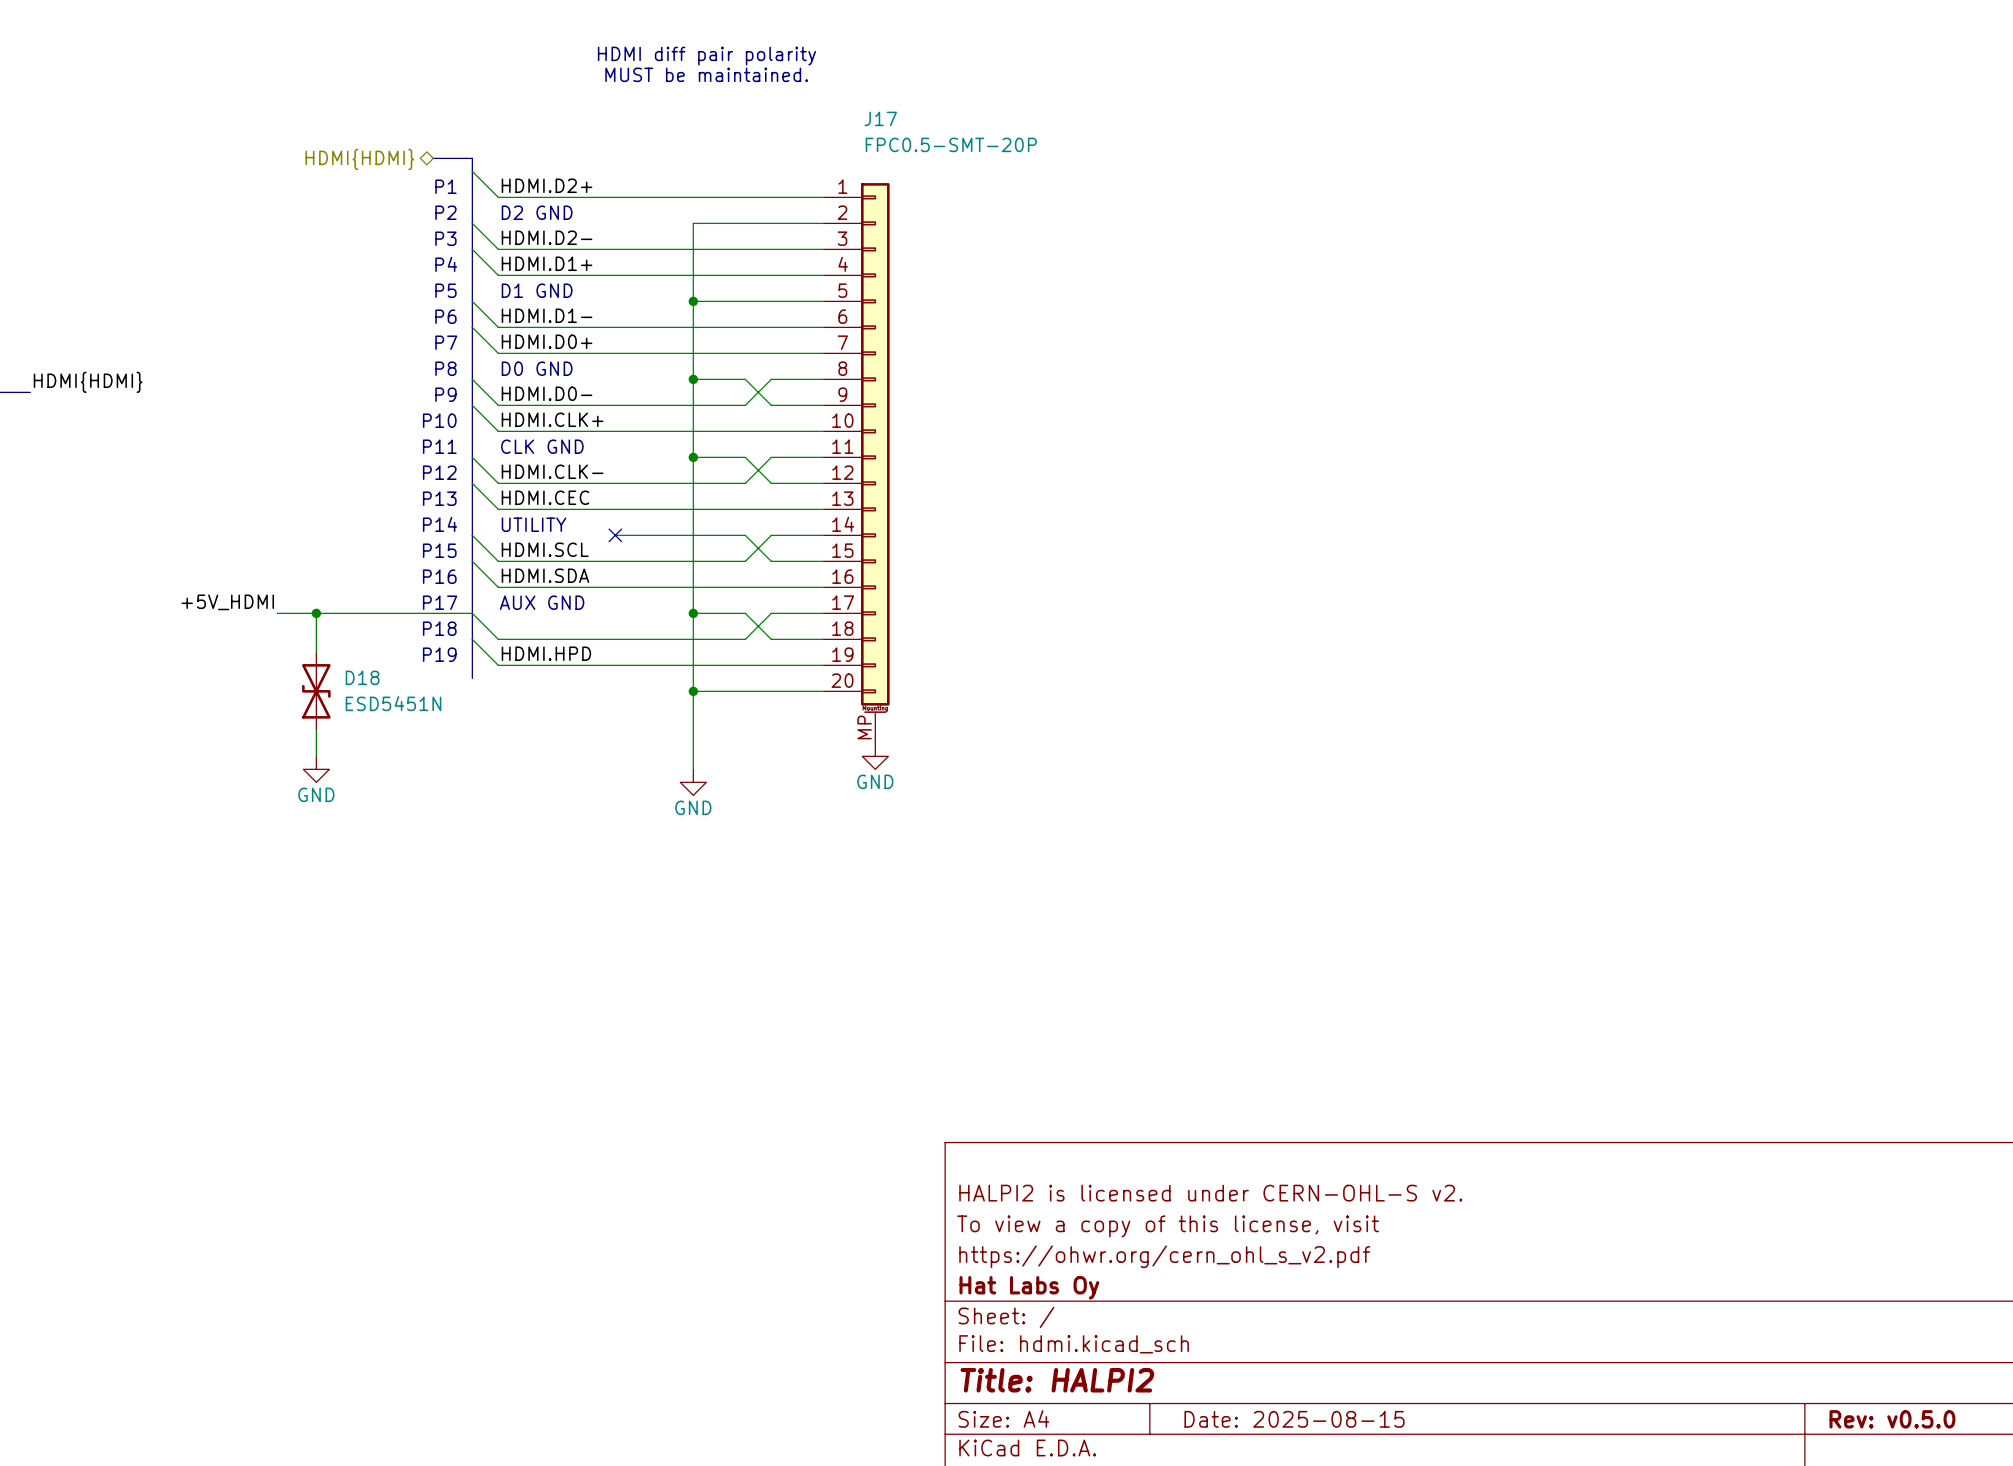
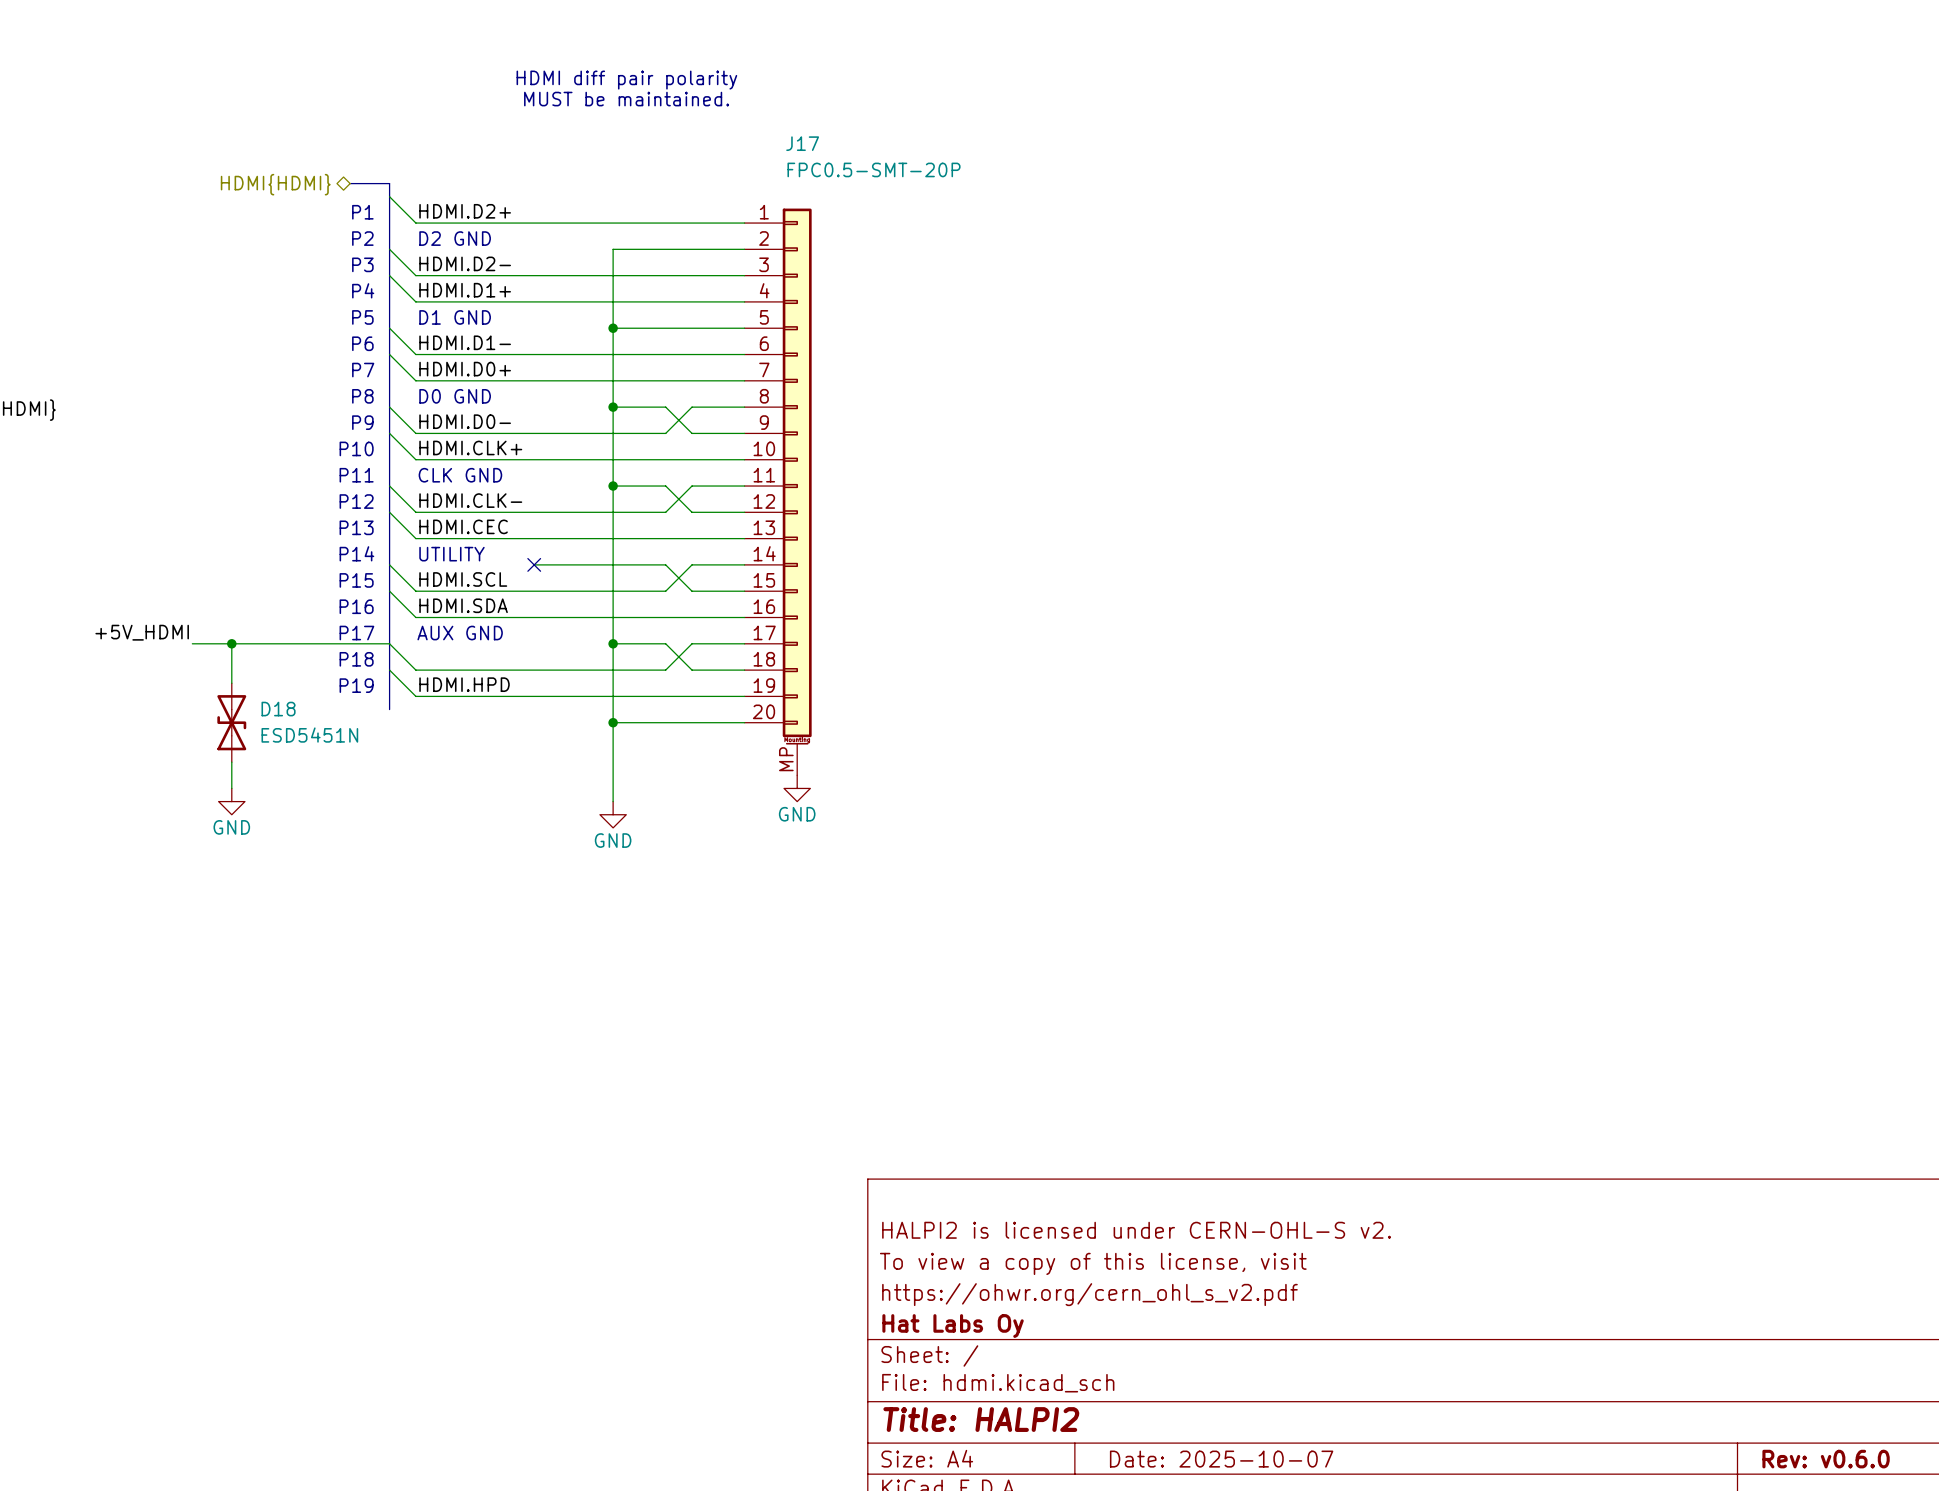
title block: Date: 2025-08-15 (1294, 1419) -> Date: 2025-10-07 (1221, 1459)
title block: Rev: v0.5.0 (1892, 1419) -> Rev: v0.6.0 (1826, 1459)

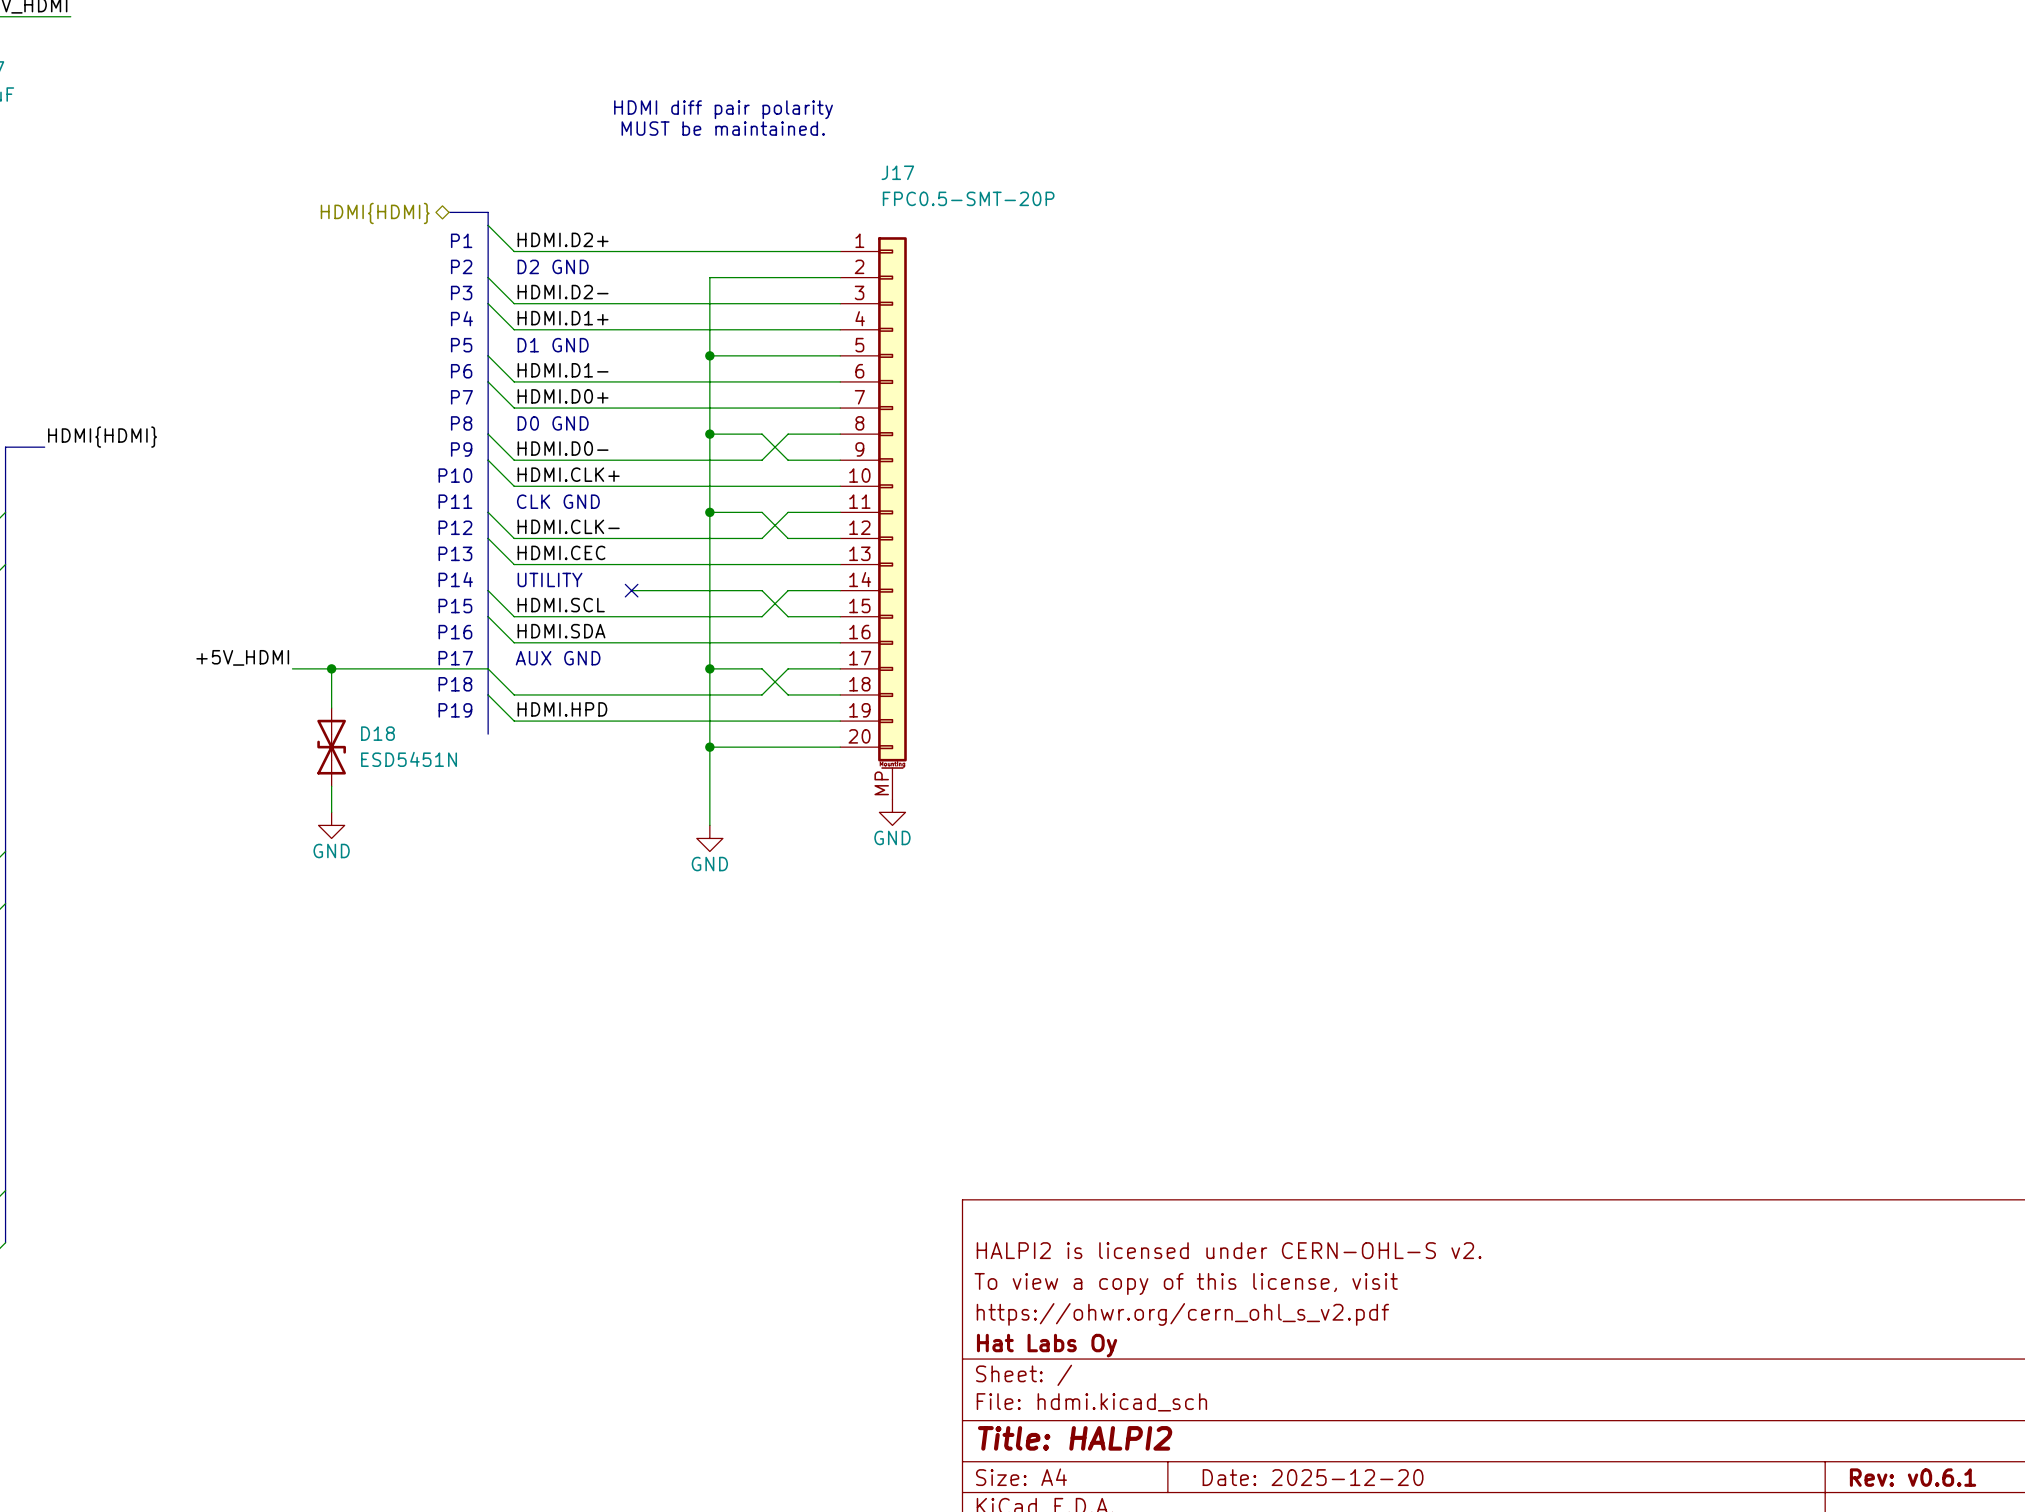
title block: Date: 2025-10-07 (1221, 1459) -> Date: 2025-12-20 (1313, 1477)
title block: Rev: v0.6.0 (1826, 1459) -> Rev: v0.6.1 (1913, 1477)

